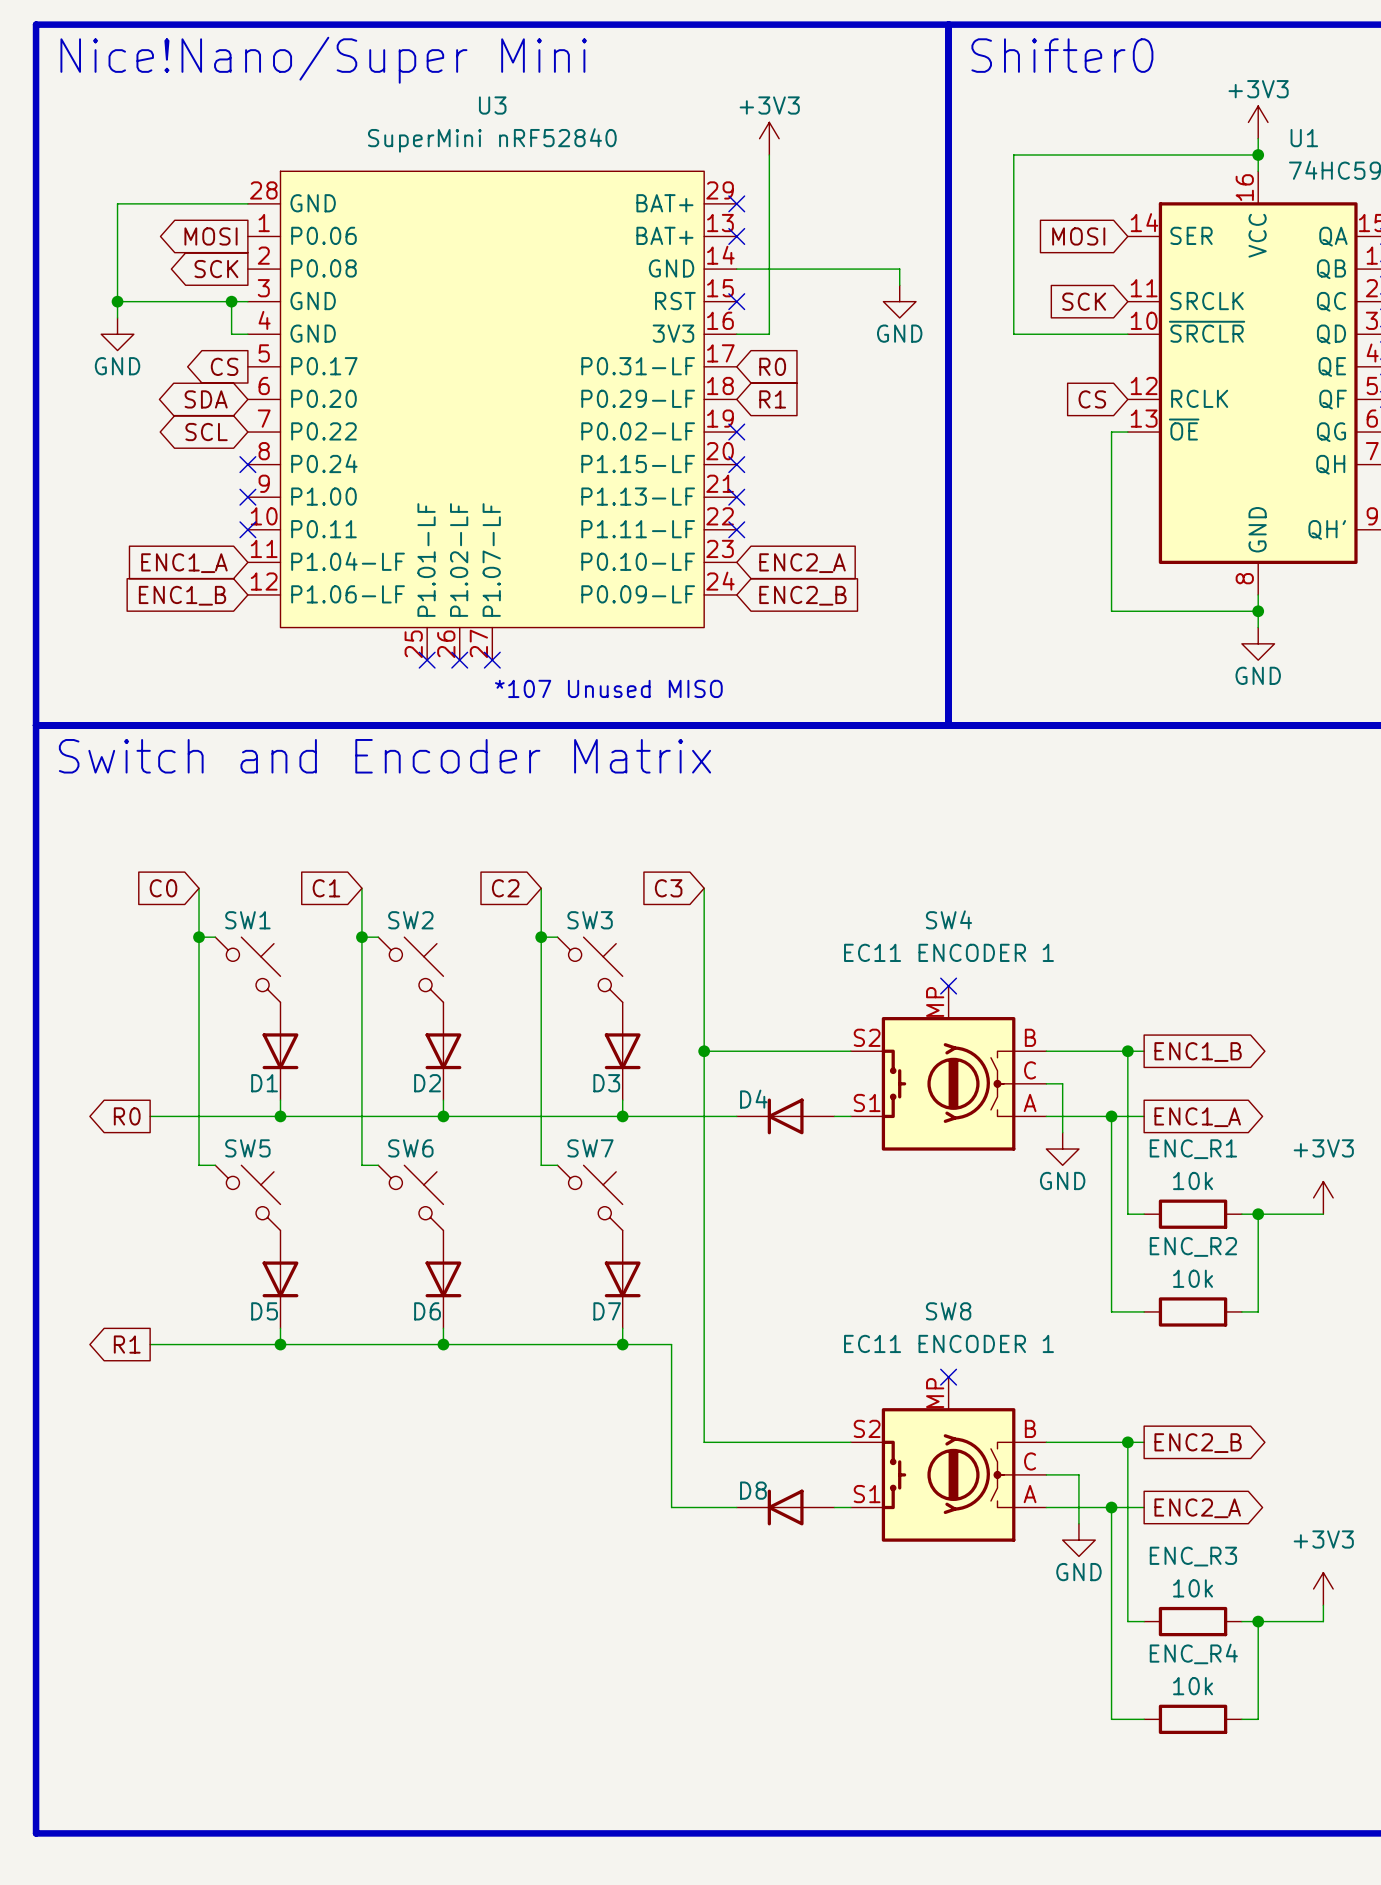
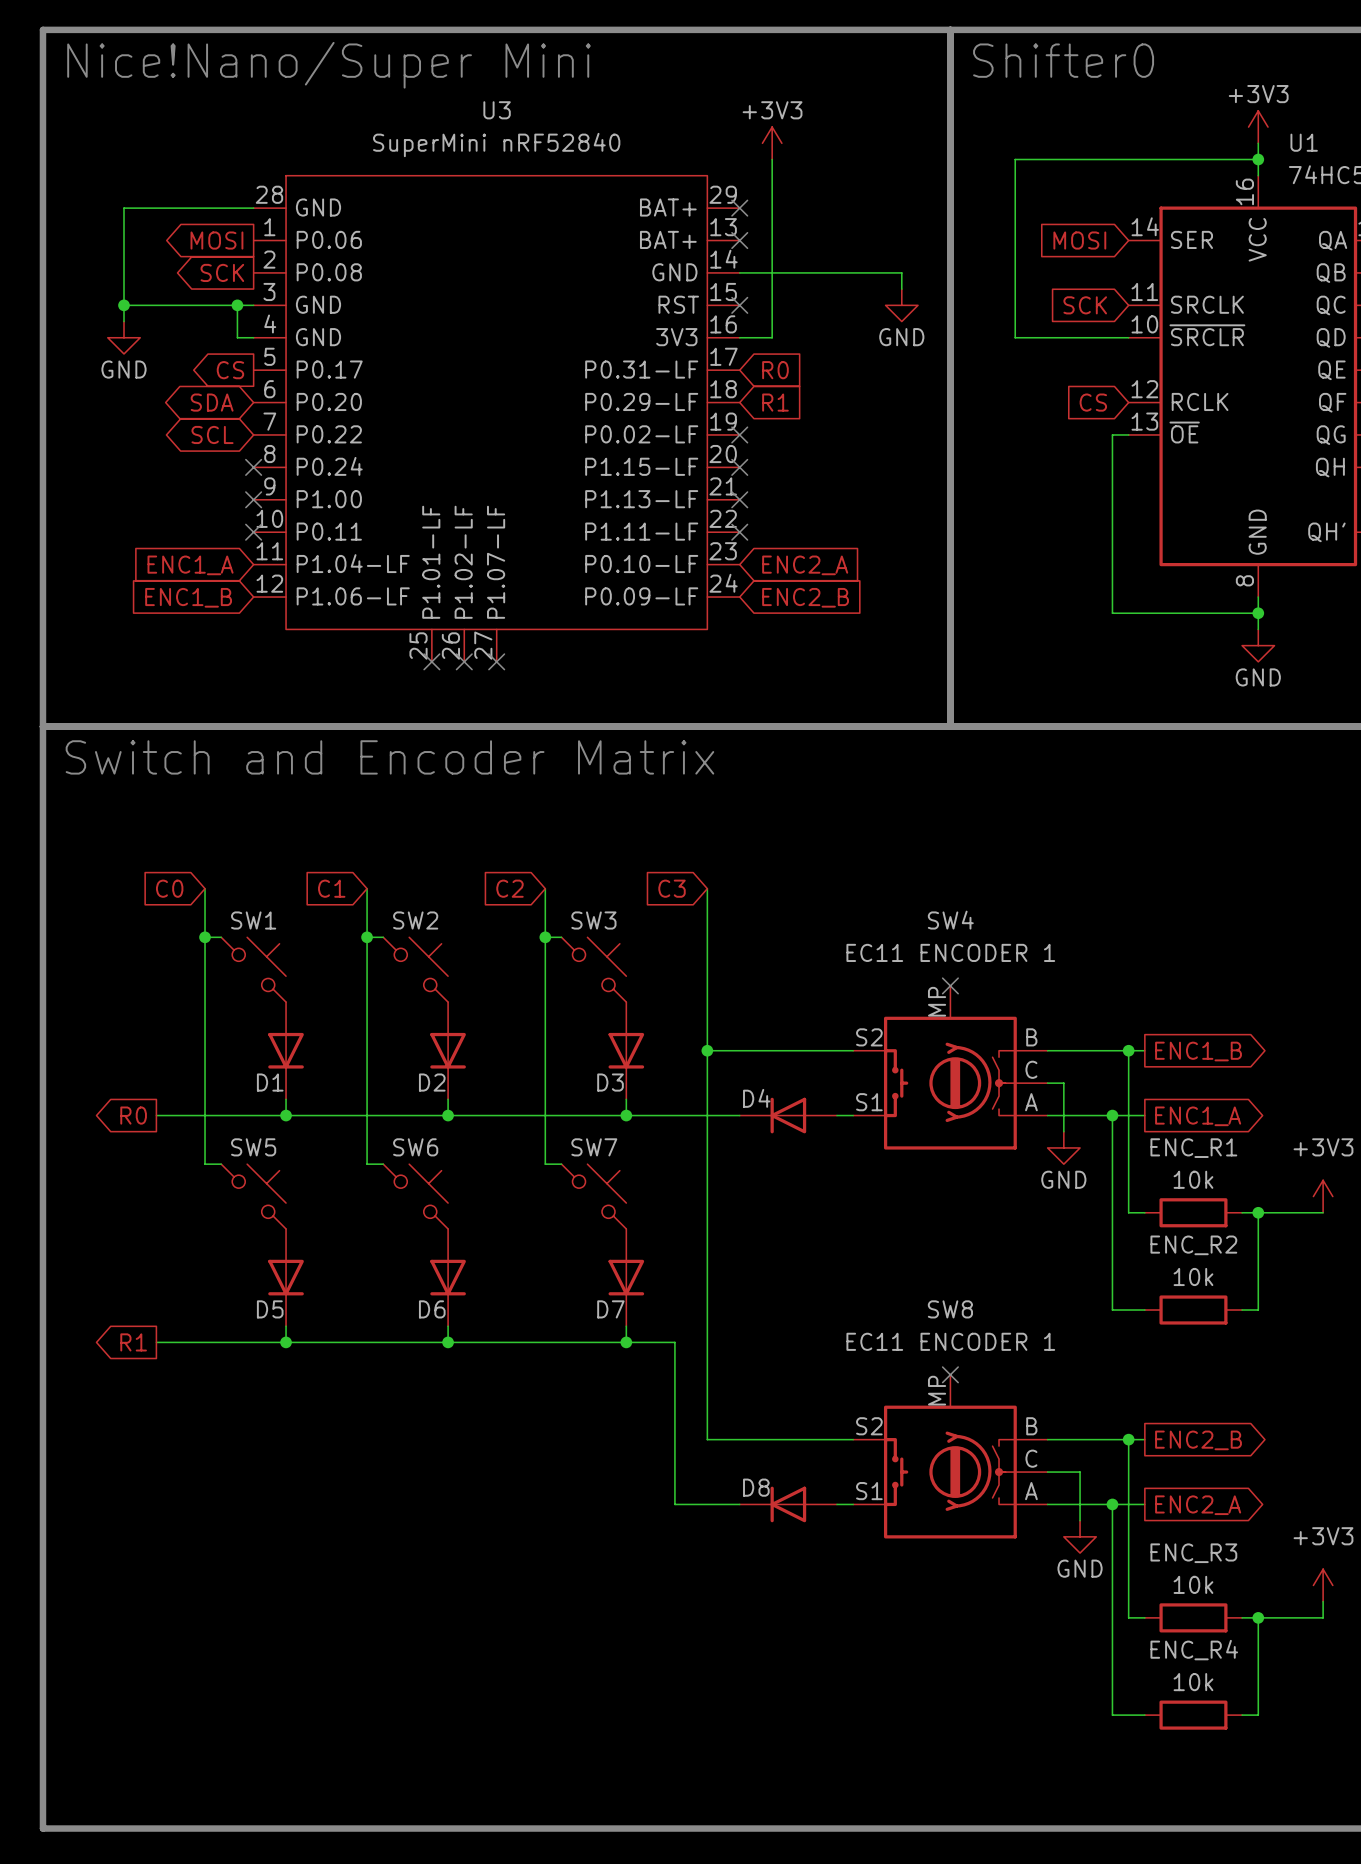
text: *107 Unused MISO (608, 688) -> none

